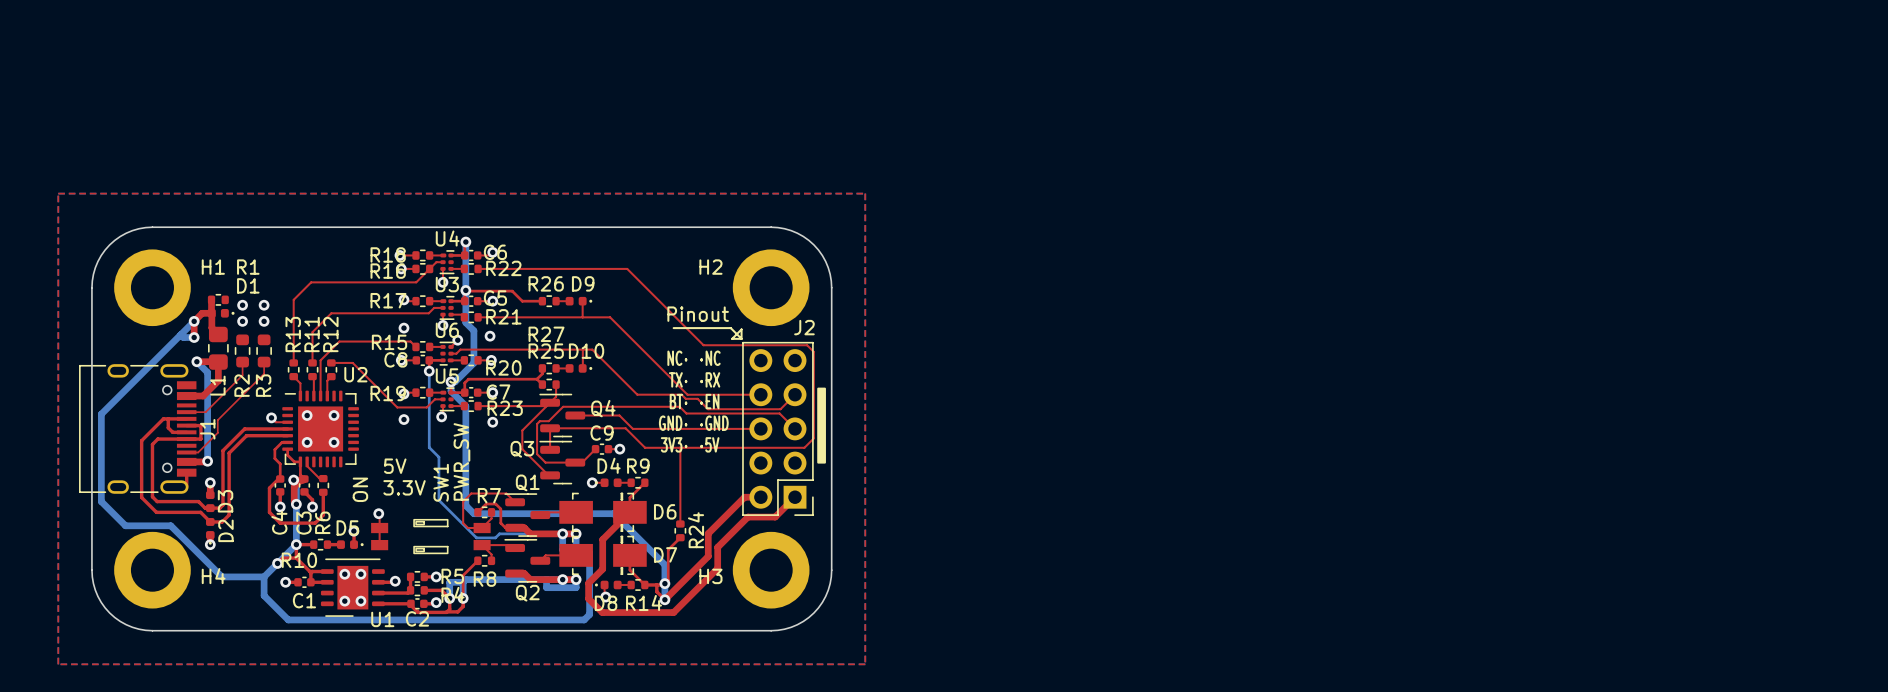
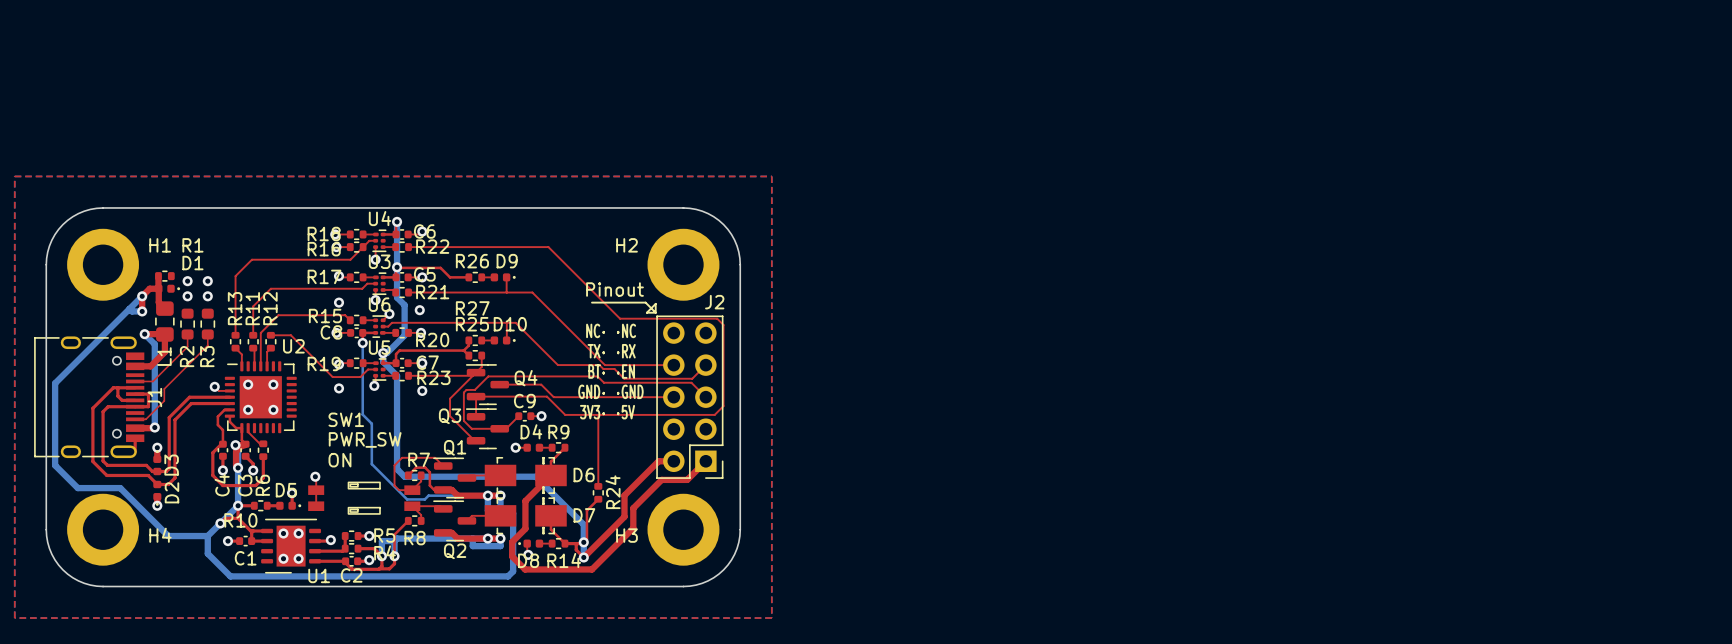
drawing: [817, 387, 826, 464] -> none
SW1 text rotation: 0° (461, 461) -> 90° clockwise (365, 439)
text: 5V (395, 466) -> none
SW1 name rotation: 0° (441, 482) -> 90° clockwise (346, 419)
text: 3.3V (404, 487) -> none
SW1 text rotation: 0° (360, 489) -> 90° clockwise (339, 460)
SW1 text position: ON (360, 489) -> ON (339, 460)

